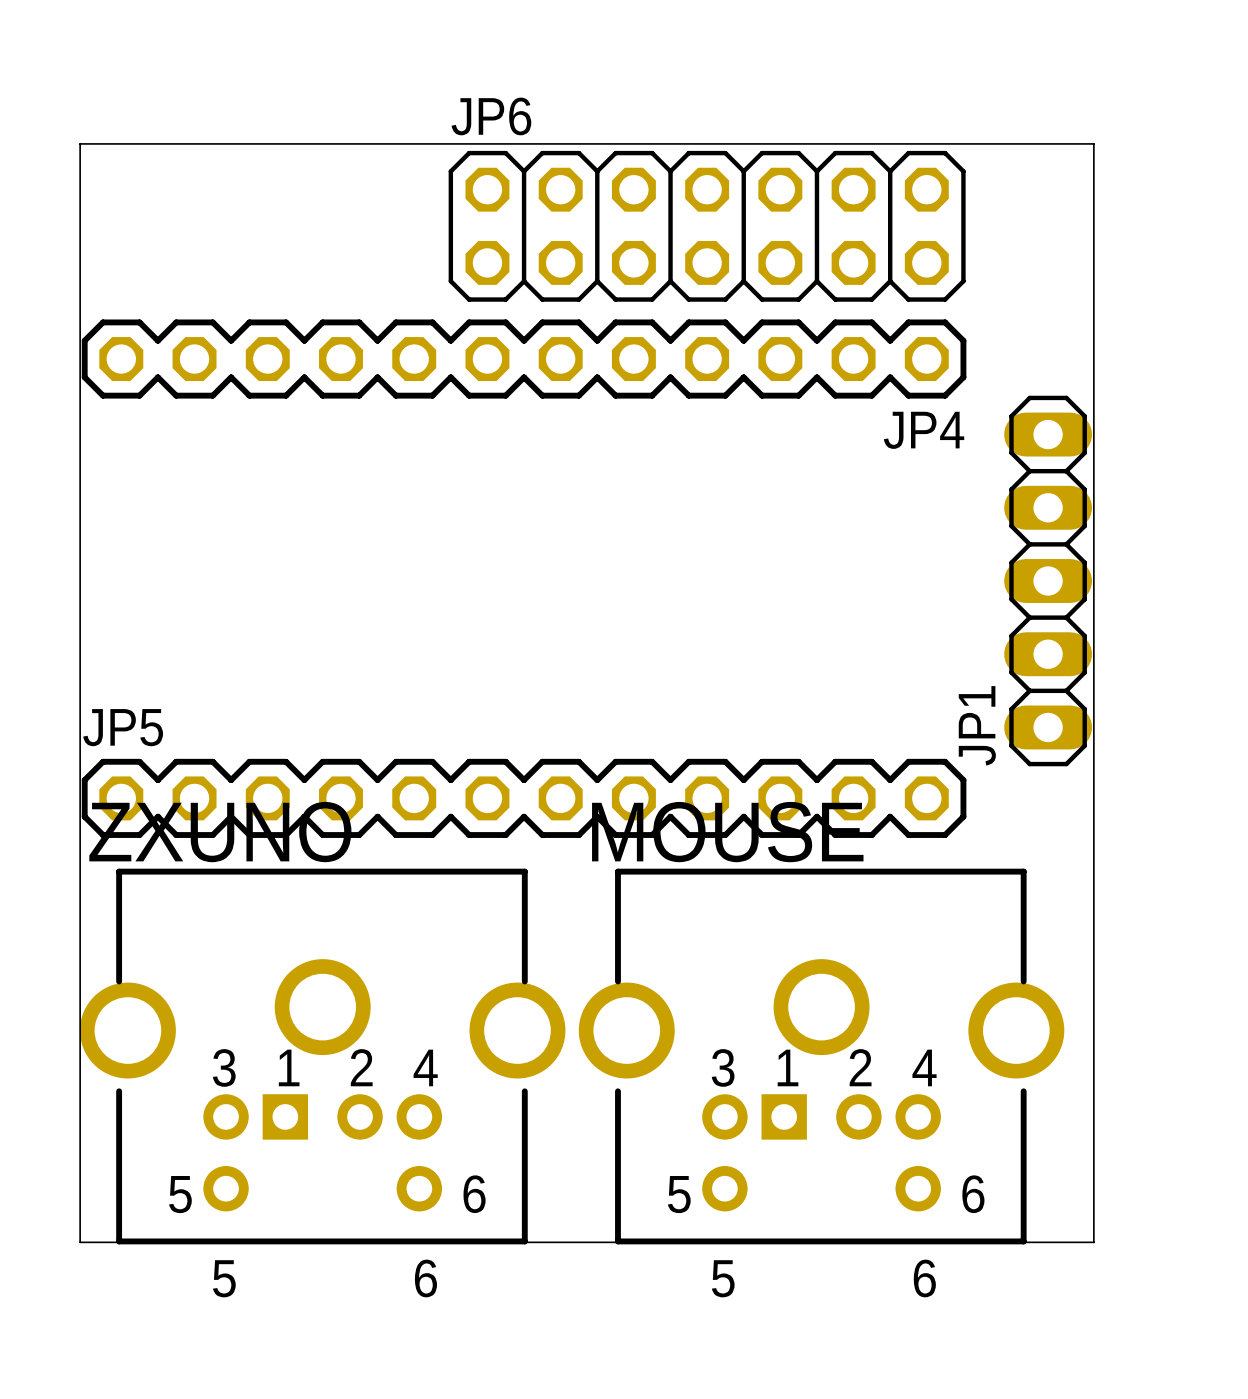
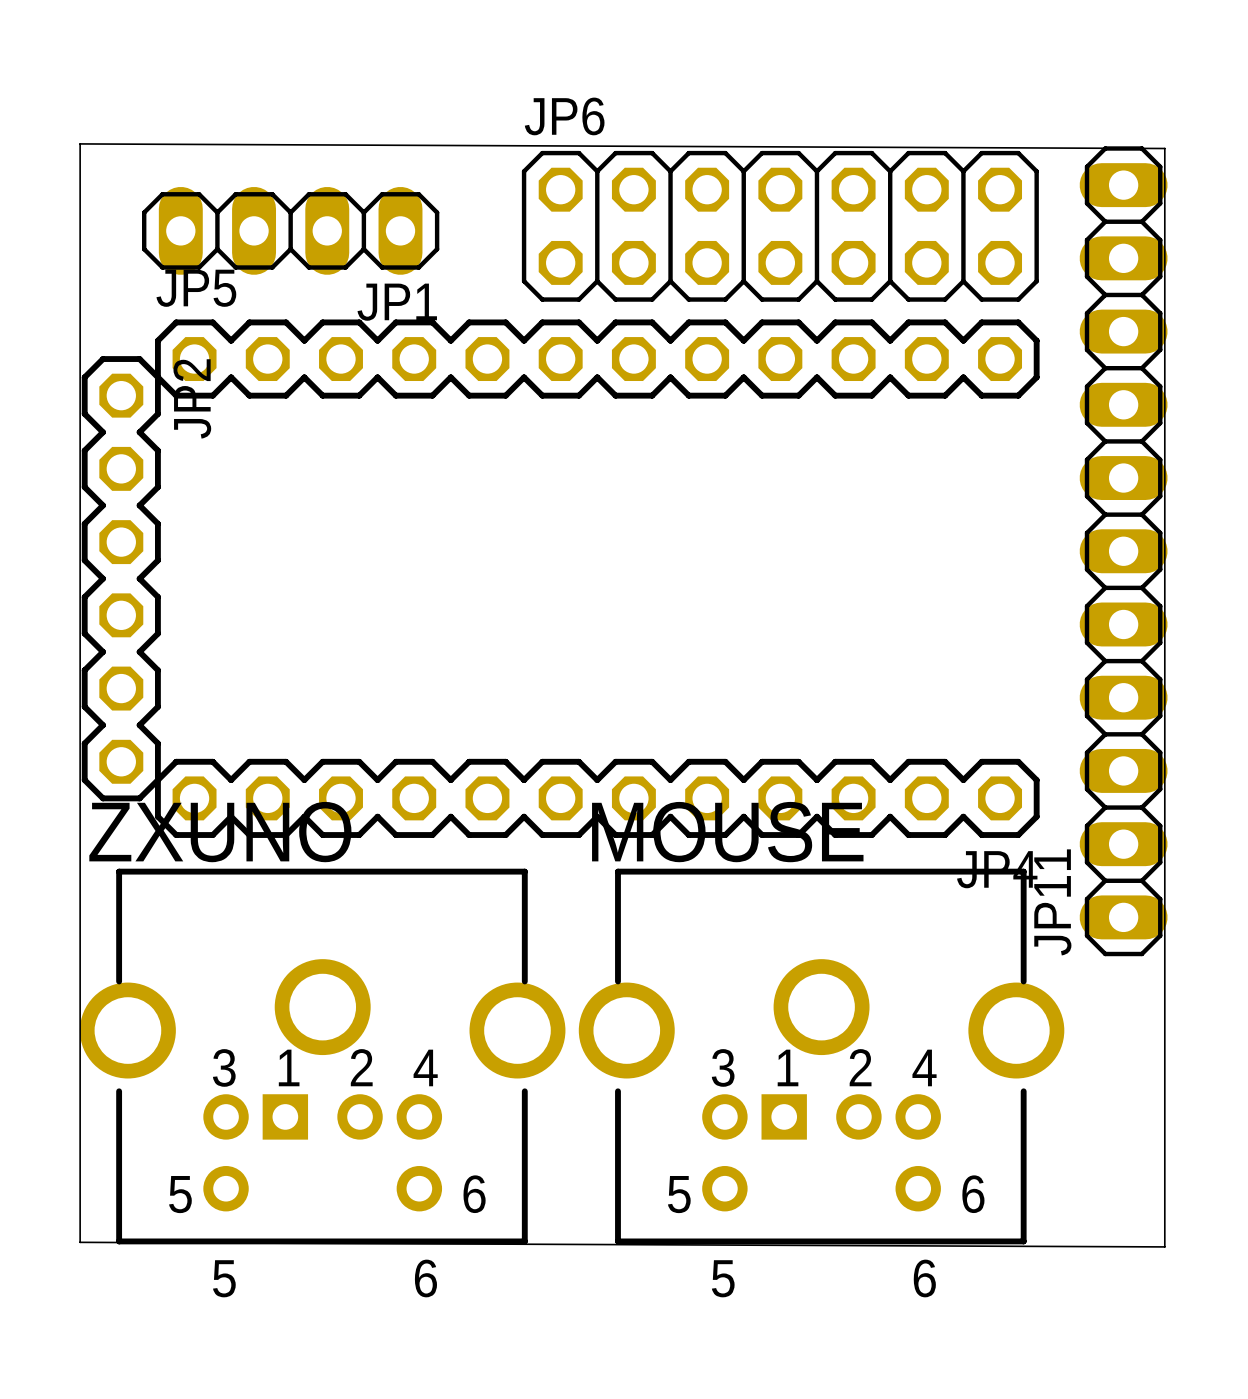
board edge: (80, 143) (1093, 143) (1093, 1242) (80, 1242) -> (80, 143) (1164, 148) (1164, 1246) (80, 1242)
JP6 position: (707, 226) -> (780, 226)
JP4 position: (524, 359) -> (597, 798)
JP1 footprint: [1004, 395, 1093, 767] -> [142, 186, 440, 275]
JP11: none -> (1123, 551)
JP2: none -> (121, 578)
JP1 name position: JP1 (977, 725) -> JP1 (397, 302)
JP5 position: (524, 798) -> (597, 359)

